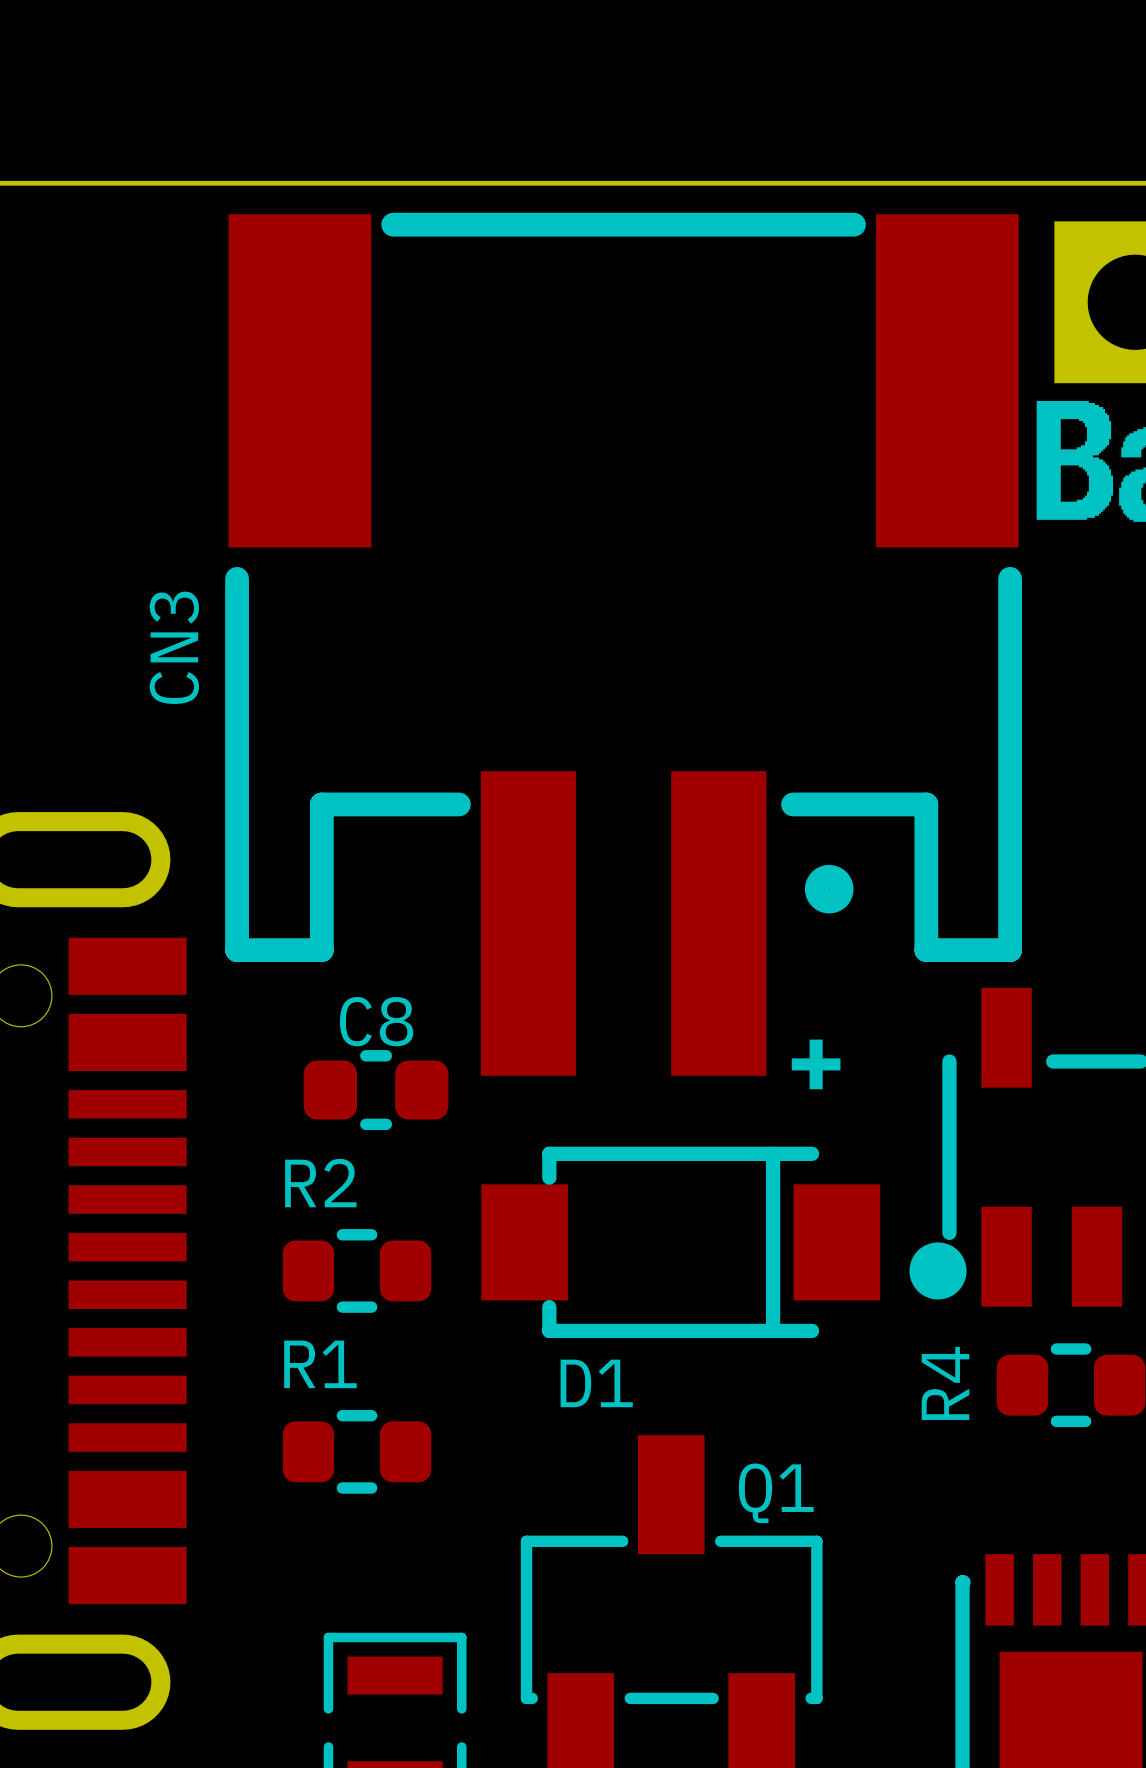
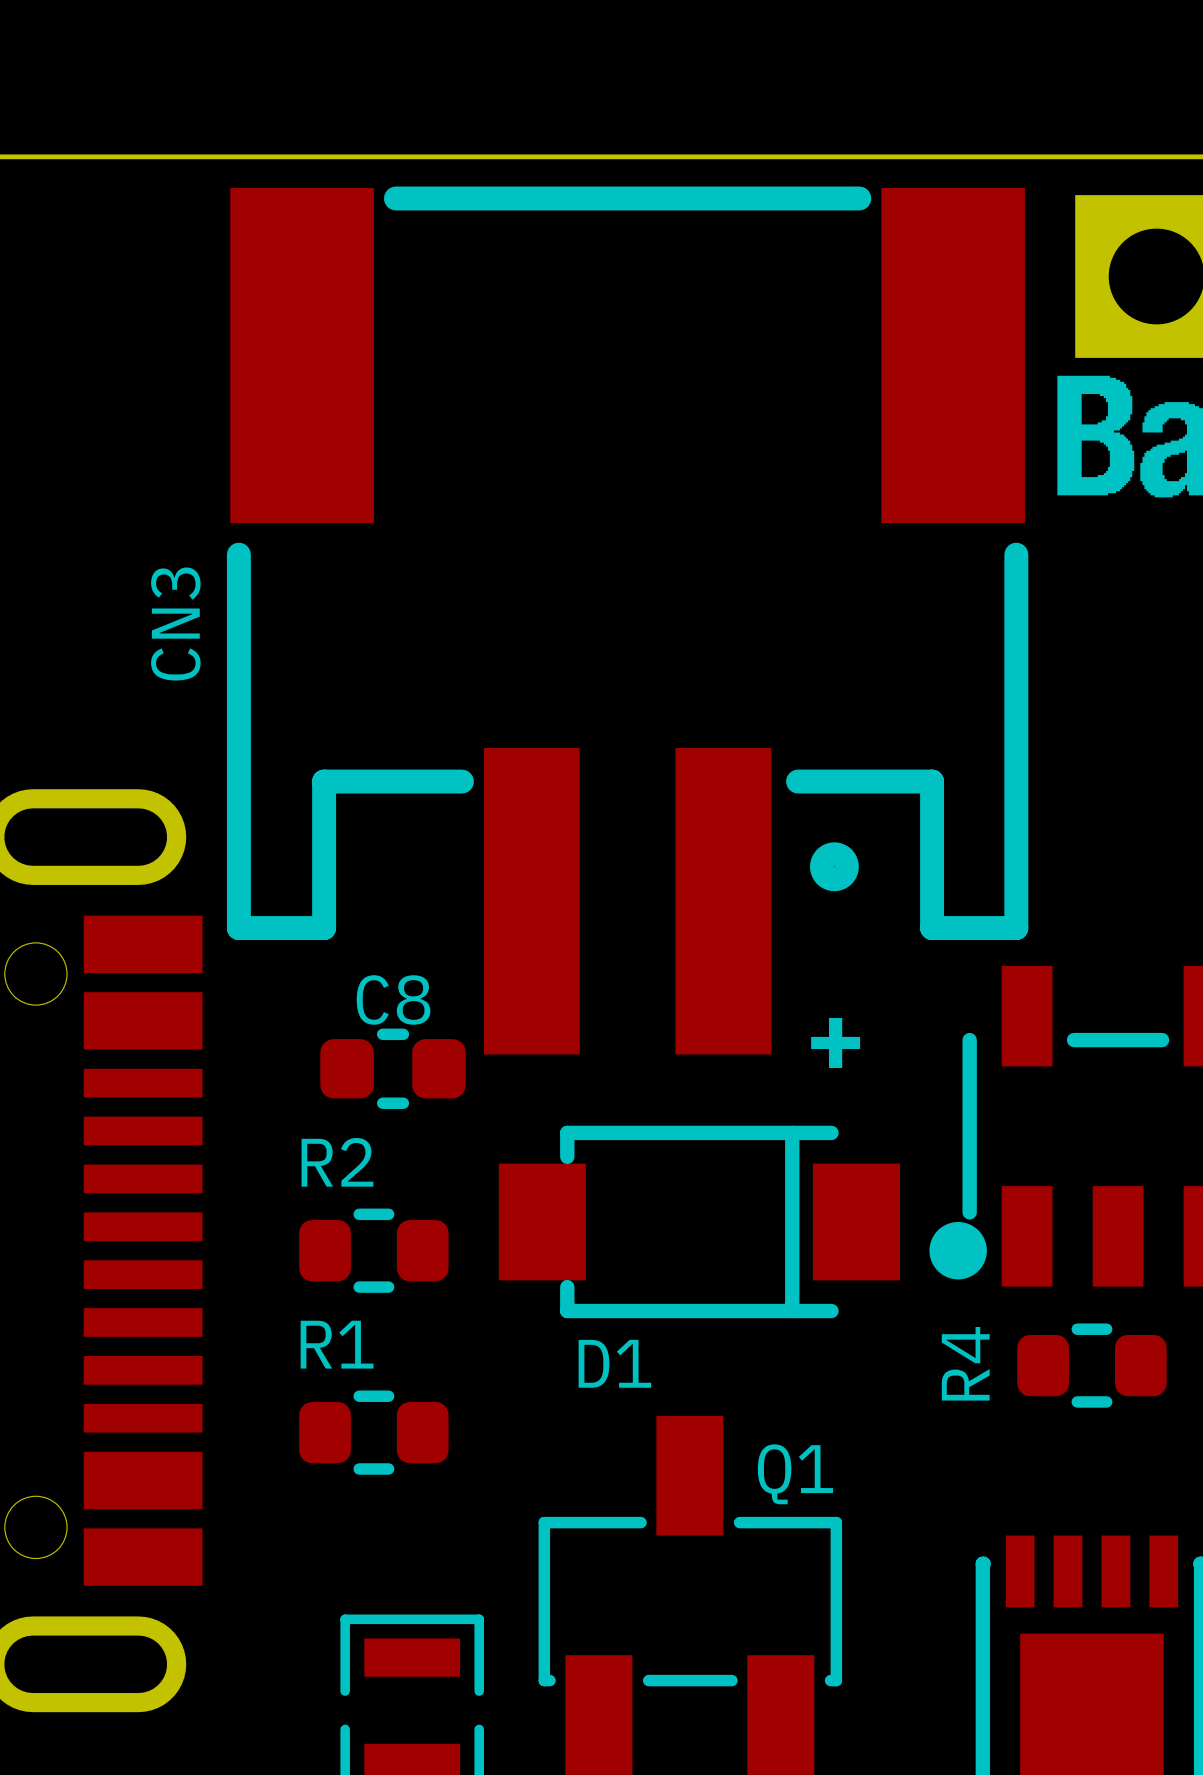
CN3 position: (623, 644) -> (627, 620)

